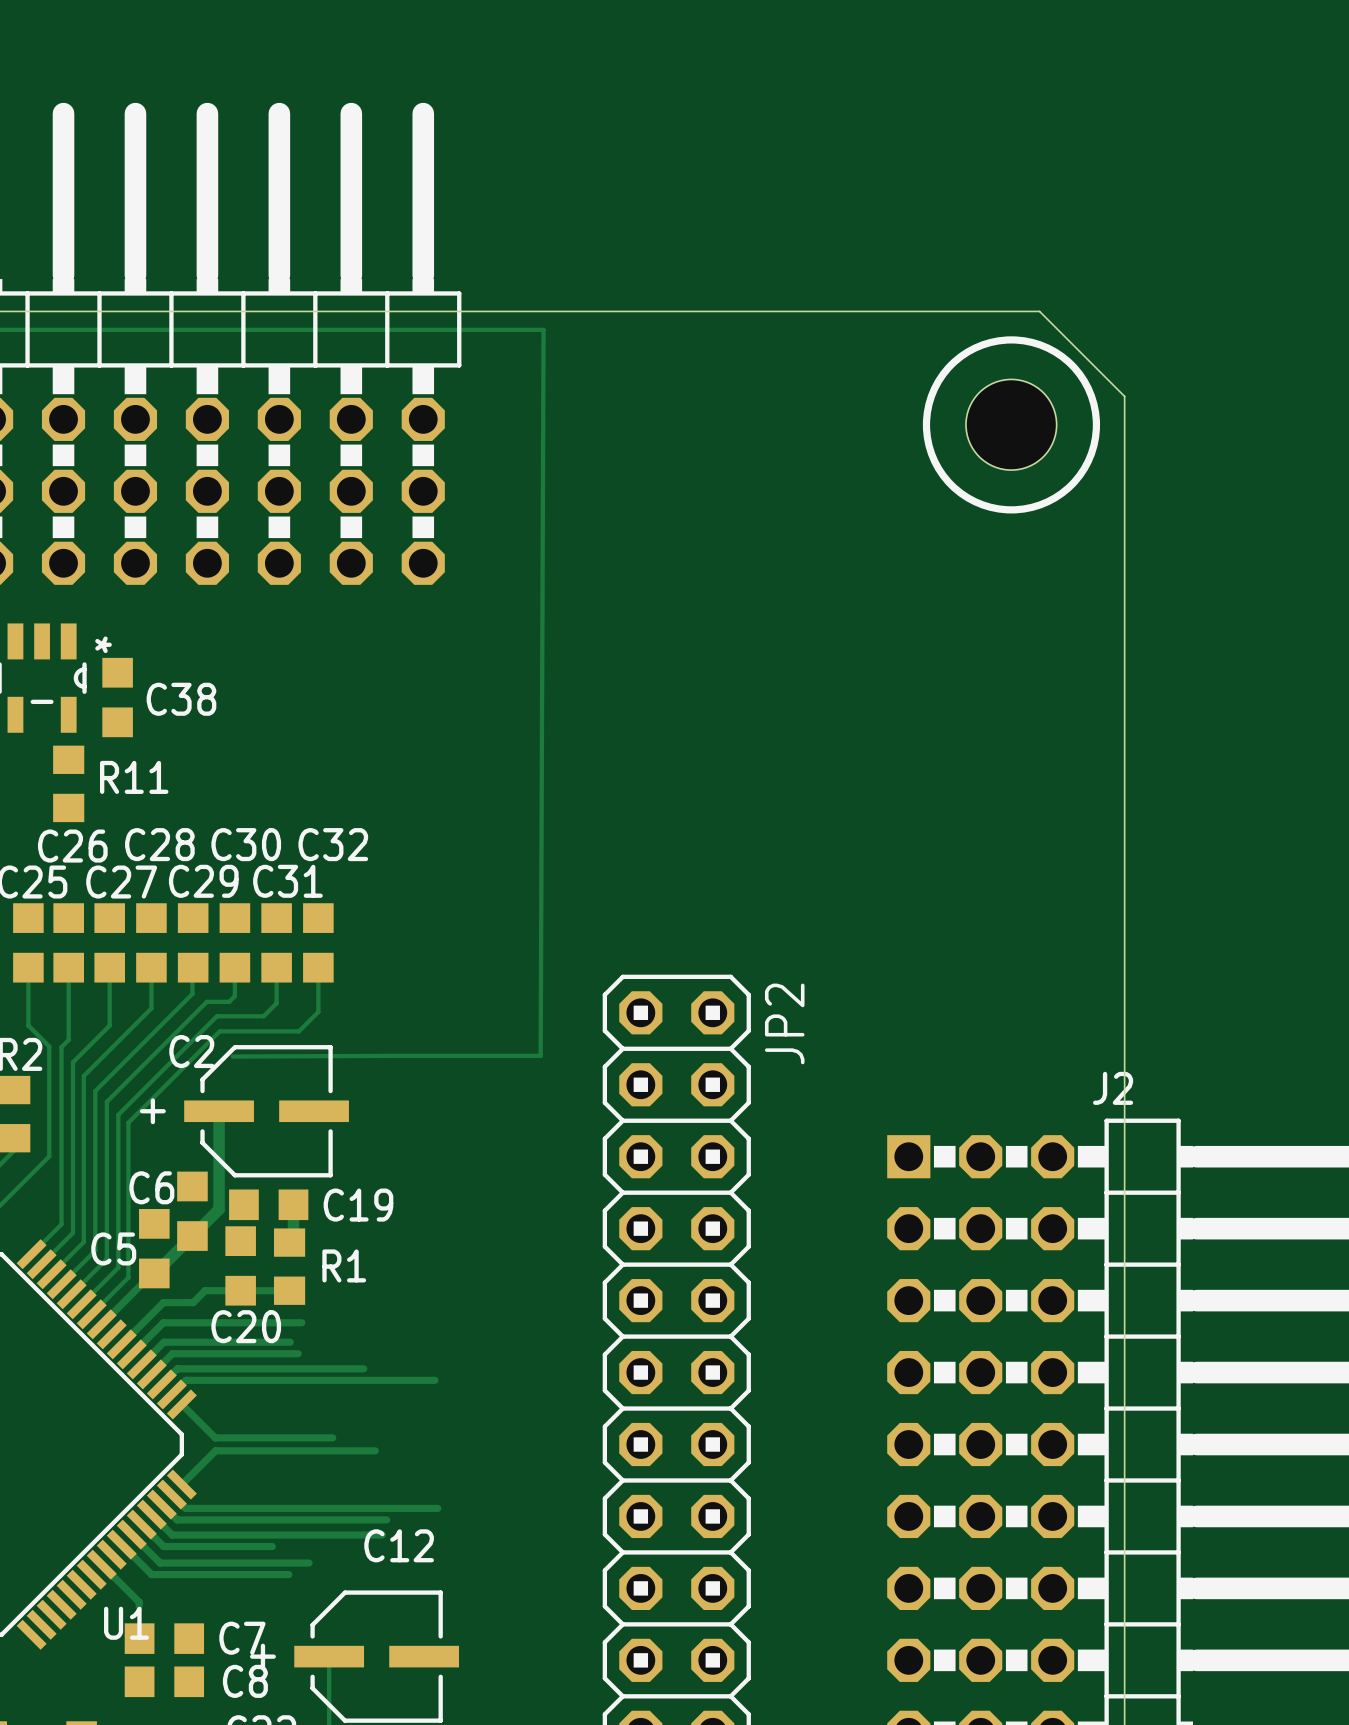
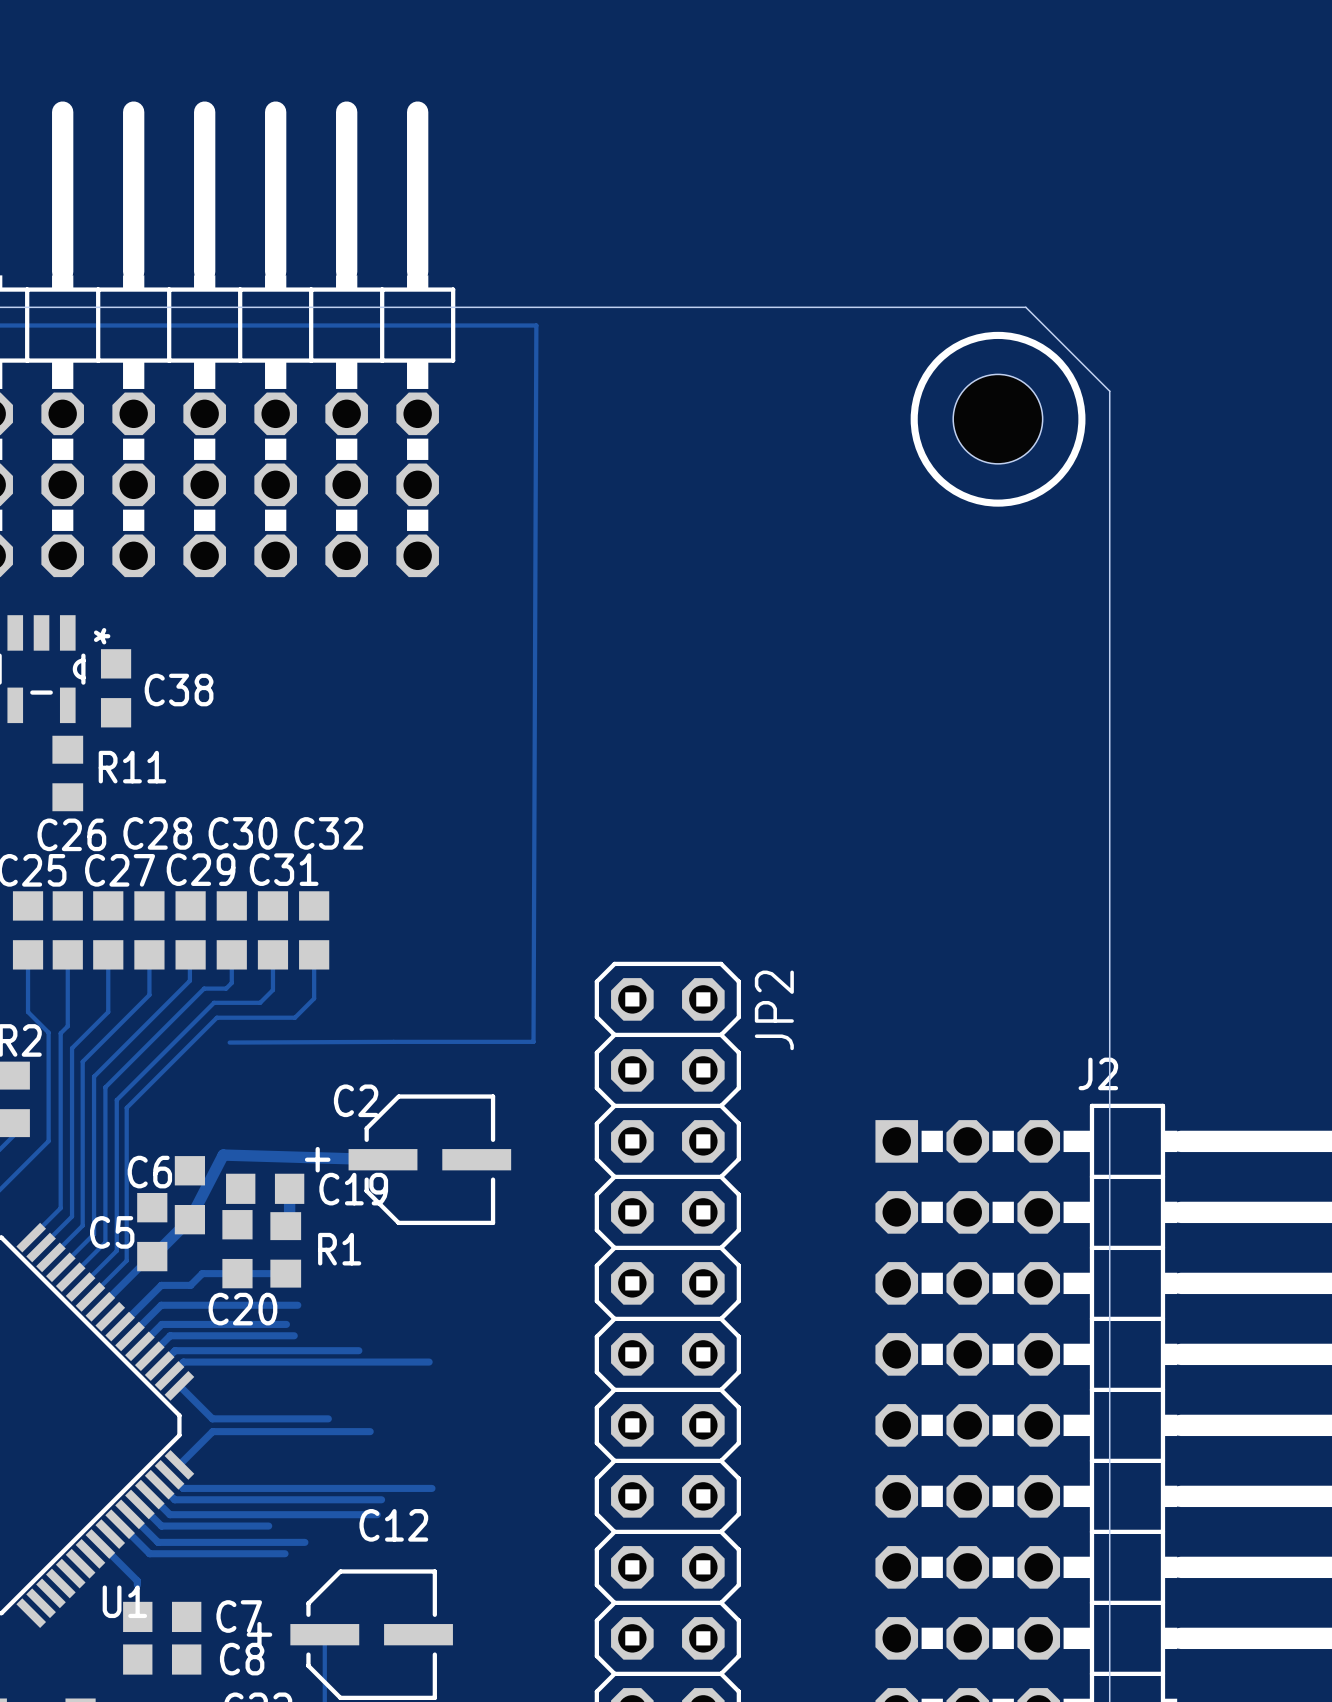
track: (219, 1111) (219, 1209) (192, 1236) -> (383, 1159) (223, 1155) (189, 1219)
C2 position: (244, 1111) -> (408, 1159)

